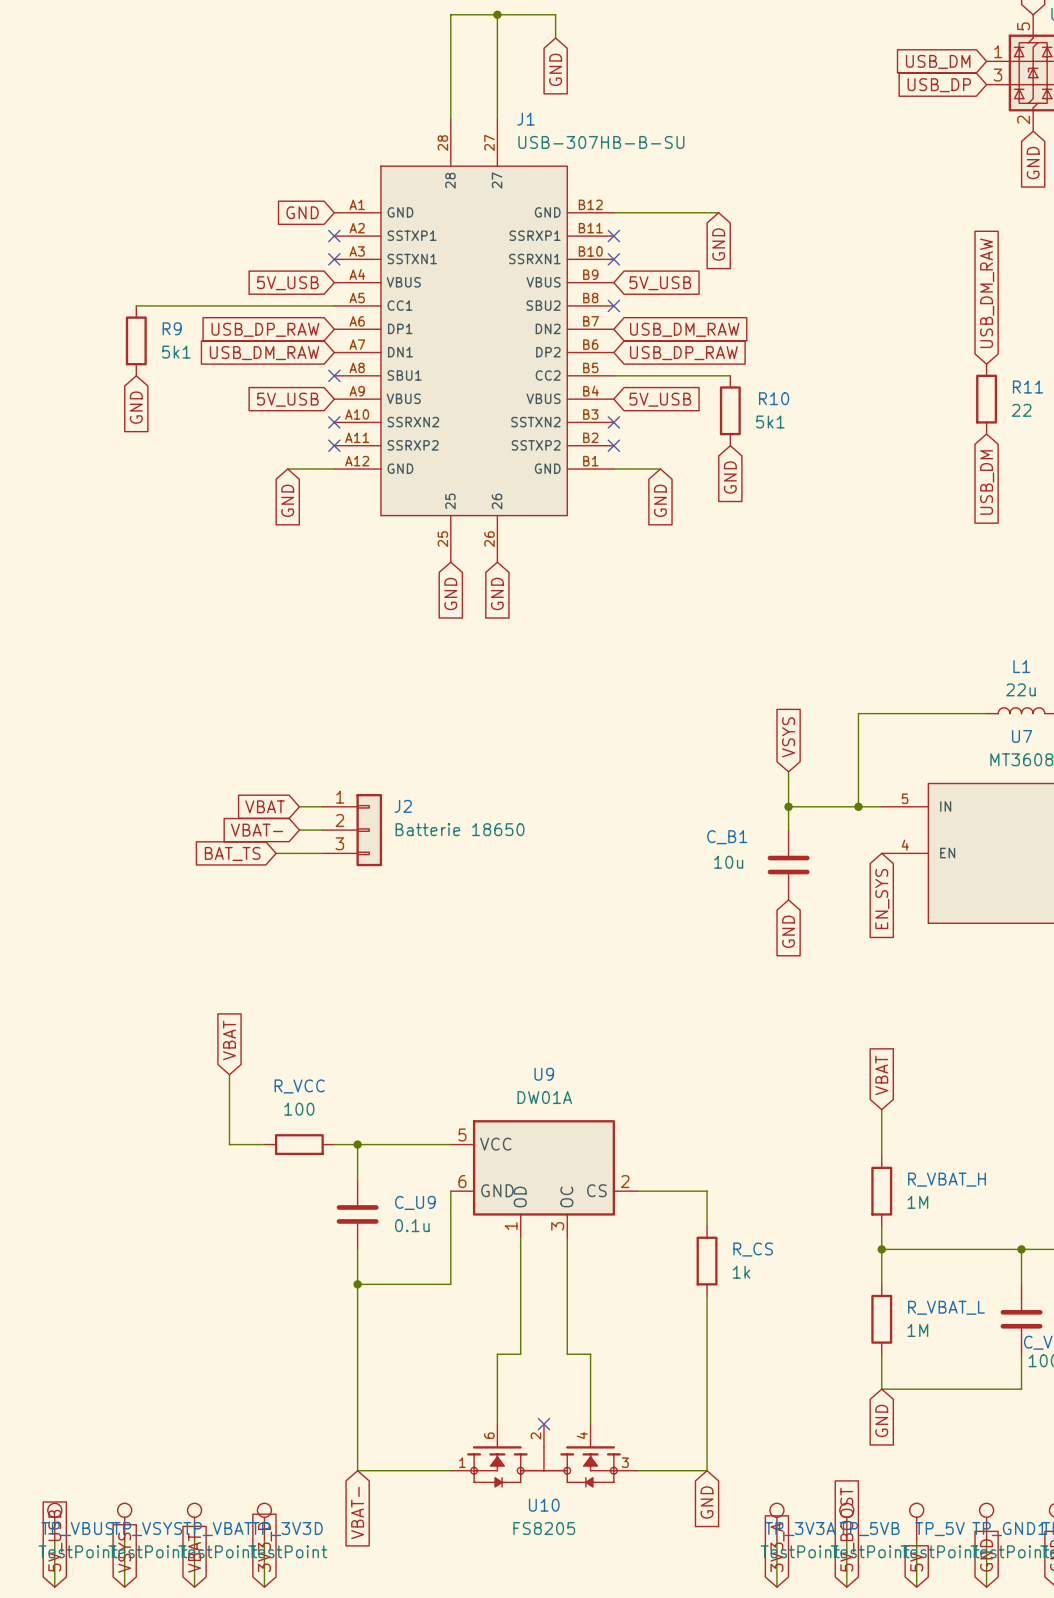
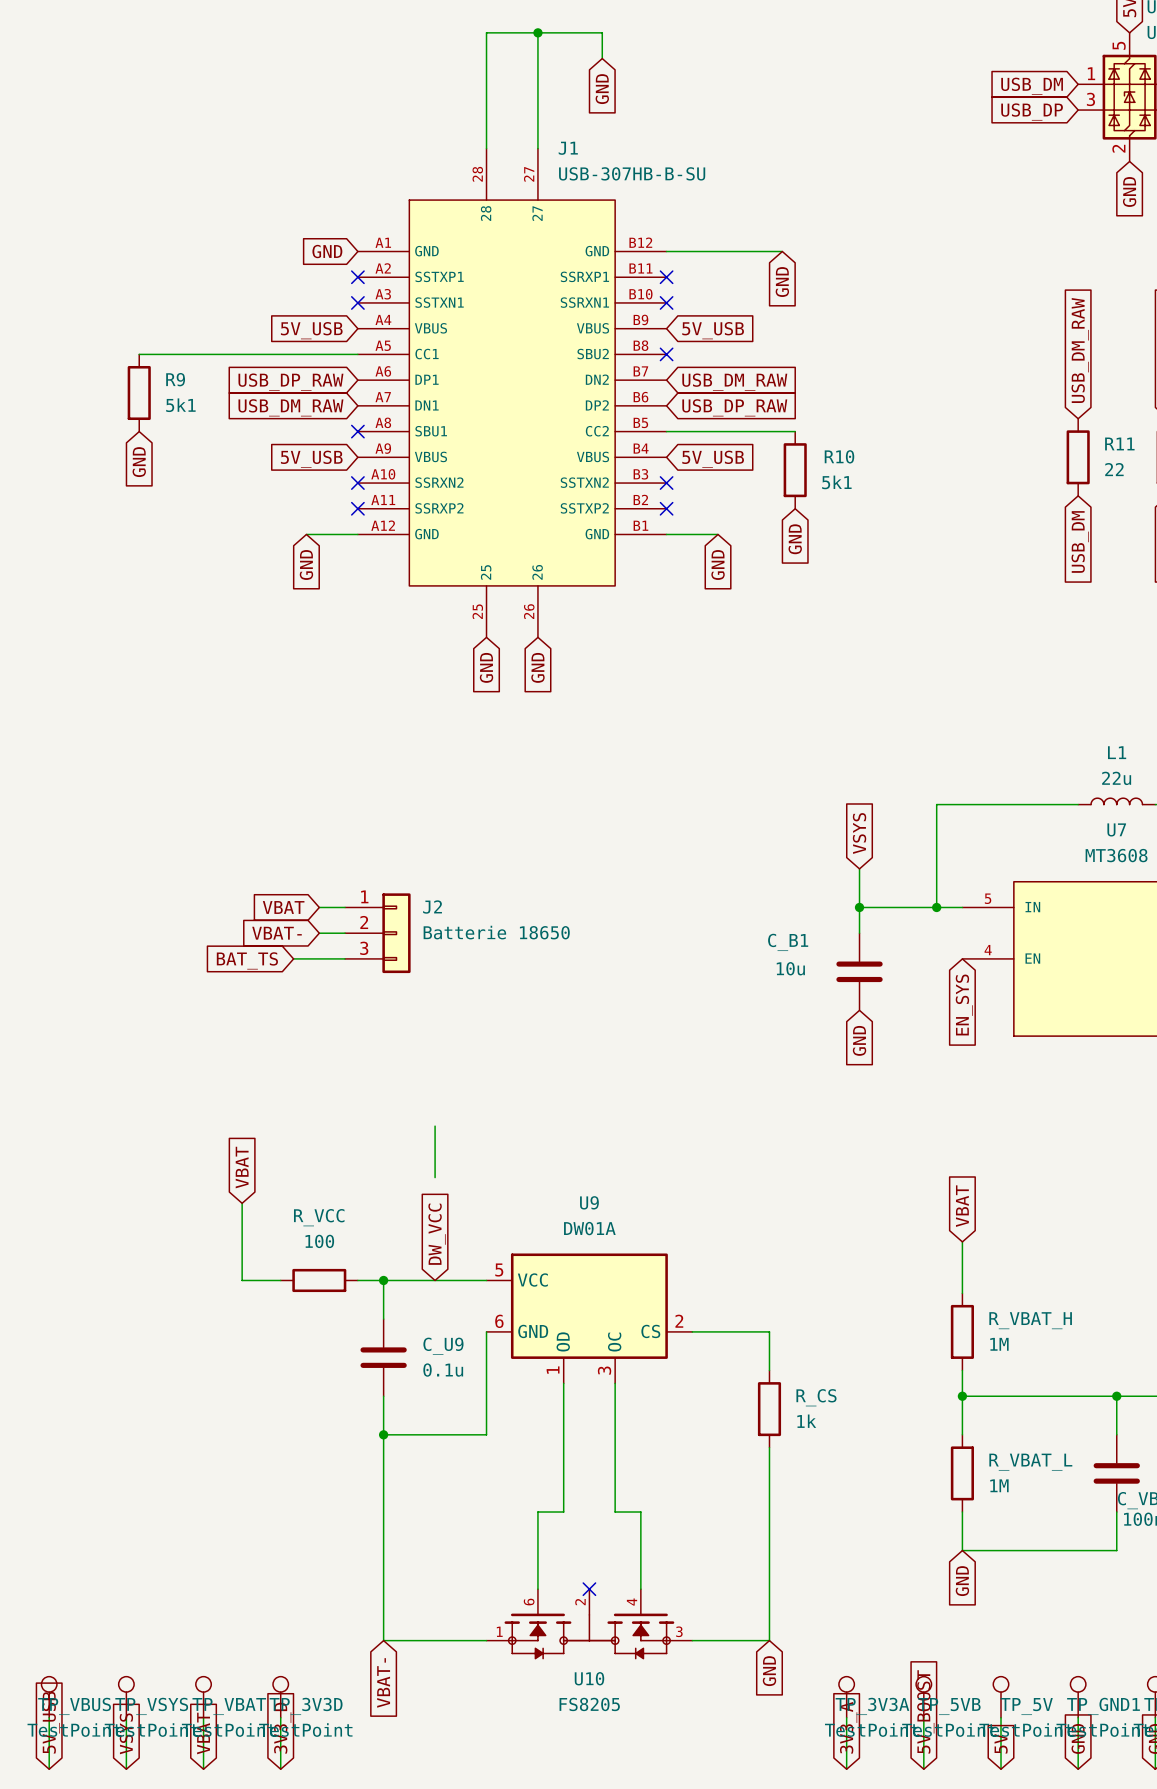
wire: none -> (435, 1126) (435, 1177)
global label: none -> DW_VCC (437, 1234)

